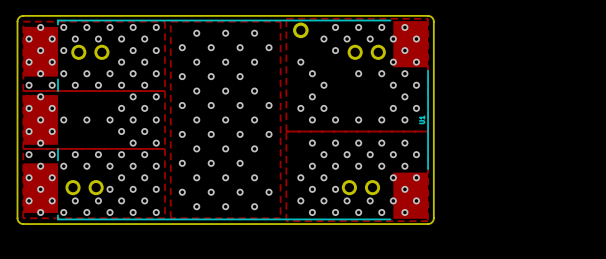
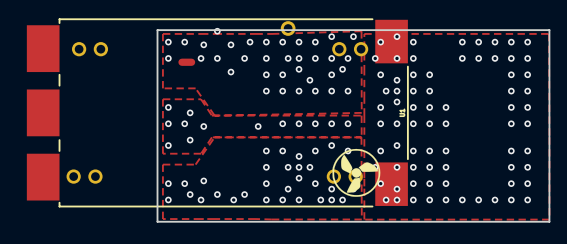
board edge: (23, 15) (430, 16) (433, 21) (433, 221) (428, 224) (20, 223) (17, 218) (17, 21) (19, 17) (23, 15) -> none
zone outline: (286, 18) (286, 221) (428, 221) (428, 18) (286, 18) -> none
zone outline: (23, 21) (23, 218) (164, 218) (164, 21) (23, 21) -> none
zone outline: (170, 21) (280, 21) (280, 218) (170, 218) (170, 21) -> none
via: (40, 27) -> none
via: (63, 27) -> none
via: (86, 27) -> none
via: (110, 27) -> none
via: (133, 27) -> none
via: (156, 27) -> none
via: (335, 27) -> none
via: (358, 27) -> none
via: (381, 27) -> none
via: (404, 27) -> none
board edge: none -> (157, 30) (549, 30) (549, 221) (157, 221) (157, 30)
via: (196, 33) -> none
via: (254, 33) -> none
zone outline: none -> (361, 31) (162, 33) (162, 88) (195, 88) (214, 115) (361, 112) (361, 31)
zone outline: none -> (364, 33) (549, 33) (549, 219) (364, 219) (364, 33)
via: (29, 39) -> none
via: (52, 39) -> none
via: (75, 39) -> none
via: (98, 39) -> none
via: (121, 39) -> none
via: (144, 39) -> none
via: (323, 39) -> none
via: (393, 39) -> none
via: none -> (168, 42)
via: none -> (184, 42)
via: none -> (250, 42)
via: none -> (266, 42)
via: none -> (282, 42)
via: none -> (299, 42)
via: none -> (315, 42)
via: none -> (380, 42)
via: none -> (413, 42)
via: none -> (462, 42)
via: none -> (478, 42)
via: none -> (495, 42)
via: none -> (511, 42)
via: none -> (527, 42)
via: (182, 47) -> none
via: (269, 47) -> none
via: (40, 50) -> none
via: (63, 50) -> none
via: (133, 50) -> none
via: (156, 50) -> none
via: (335, 50) -> none
via: (404, 50) -> none
via: (29, 62) -> none
via: (52, 62) -> none
via: (121, 62) -> none
via: (144, 62) -> none
via: none -> (168, 58)
via: (196, 62) -> none
via: none -> (201, 58)
via: none -> (266, 58)
via: none -> (299, 58)
via: none -> (315, 58)
via: none -> (331, 58)
via: none -> (348, 58)
via: none -> (413, 58)
via: none -> (462, 58)
via: none -> (478, 58)
via: none -> (495, 58)
via: none -> (511, 58)
via: none -> (527, 58)
track: none -> (181, 62) (191, 62)
via: (40, 73) -> none
via: (63, 73) -> none
via: (86, 73) -> none
via: (110, 73) -> none
via: (133, 73) -> none
via: (156, 73) -> none
via: (381, 73) -> none
via: (404, 73) -> none
via: (182, 76) -> none
via: (211, 76) -> none
via: none -> (266, 74)
via: none -> (282, 74)
via: none -> (331, 74)
via: none -> (380, 74)
via: none -> (413, 74)
via: none -> (429, 74)
via: none -> (511, 74)
via: none -> (527, 74)
via: (29, 85) -> none
via: (52, 85) -> none
via: (75, 85) -> none
via: (98, 85) -> none
via: (121, 85) -> none
via: (144, 85) -> none
via: (393, 85) -> none
zone outline: (23, 91) (164, 91) -> none
via: (196, 91) -> none
via: (225, 91) -> none
via: (254, 91) -> none
via: (40, 96) -> none
via: (133, 96) -> none
via: (156, 96) -> none
via: none -> (266, 91)
via: none -> (282, 91)
via: none -> (315, 91)
via: none -> (331, 91)
via: none -> (348, 91)
via: none -> (397, 91)
via: none -> (413, 91)
via: none -> (429, 91)
via: none -> (511, 91)
via: none -> (527, 91)
zone outline: none -> (162, 99) (162, 153) (201, 153) (211, 137) (361, 137) (361, 115) (211, 115) (201, 99) (162, 99)
via: (182, 105) -> none
via: (211, 105) -> none
via: (240, 105) -> none
via: (269, 105) -> none
via: (29, 108) -> none
via: (52, 108) -> none
via: (121, 108) -> none
via: (144, 108) -> none
via: (300, 108) -> none
via: (323, 108) -> none
via: (393, 108) -> none
via: none -> (168, 107)
via: none -> (380, 107)
via: none -> (413, 107)
via: none -> (429, 107)
via: none -> (446, 107)
via: none -> (511, 107)
via: none -> (527, 107)
via: (40, 119) -> none
via: (63, 119) -> none
via: (86, 119) -> none
via: (110, 119) -> none
via: (133, 119) -> none
via: (156, 119) -> none
via: (225, 119) -> none
via: (254, 119) -> none
via: (312, 119) -> none
via: (335, 119) -> none
via: (358, 119) -> none
via: (381, 119) -> none
via: (404, 119) -> none
via: (29, 131) -> none
via: (52, 131) -> none
via: (121, 131) -> none
via: (144, 131) -> none
via: none -> (168, 123)
via: none -> (184, 123)
zone outline: (286, 131) (428, 131) -> none
via: none -> (282, 123)
via: none -> (299, 123)
via: none -> (315, 123)
via: none -> (331, 123)
via: none -> (348, 123)
via: none -> (380, 123)
via: none -> (397, 123)
via: none -> (413, 123)
via: none -> (429, 123)
via: none -> (446, 123)
via: none -> (511, 123)
via: none -> (527, 123)
via: (182, 134) -> none
via: (240, 134) -> none
via: (40, 143) -> none
via: (133, 143) -> none
via: (156, 143) -> none
via: (312, 143) -> none
via: (335, 143) -> none
via: (358, 143) -> none
via: (381, 143) -> none
via: (404, 143) -> none
zone outline: none -> (214, 137) (195, 164) (162, 164) (162, 219) (361, 219) (361, 137)
zone outline: (23, 148) (164, 148) -> none
via: (225, 148) -> none
via: (254, 148) -> none
via: (29, 154) -> none
via: (52, 154) -> none
via: (75, 154) -> none
via: (98, 154) -> none
via: (121, 154) -> none
via: (144, 154) -> none
via: none -> (168, 145)
via: (323, 154) -> none
via: (370, 154) -> none
via: (393, 154) -> none
drawing: none -> [332, 148, 381, 197]
via: none -> (266, 150)
via: none -> (282, 150)
via: none -> (315, 150)
via: none -> (348, 150)
via: none -> (380, 150)
via: none -> (413, 150)
via: none -> (429, 150)
via: none -> (446, 150)
via: none -> (511, 150)
via: none -> (527, 150)
via: (182, 163) -> none
via: (211, 163) -> none
via: (240, 163) -> none
via: (40, 166) -> none
via: (63, 166) -> none
via: (86, 166) -> none
via: (110, 166) -> none
via: (133, 166) -> none
via: (156, 166) -> none
via: (335, 166) -> none
via: (358, 166) -> none
via: (381, 166) -> none
via: (404, 166) -> none
via: (29, 177) -> none
via: (52, 177) -> none
via: (121, 177) -> none
via: (144, 177) -> none
via: (196, 177) -> none
via: (225, 177) -> none
via: (254, 177) -> none
via: none -> (266, 167)
via: none -> (299, 167)
via: none -> (413, 167)
via: none -> (429, 167)
via: none -> (446, 167)
via: none -> (511, 167)
via: none -> (527, 167)
via: (40, 189) -> none
via: (110, 189) -> none
via: (133, 189) -> none
via: (156, 189) -> none
via: (335, 189) -> none
via: (404, 189) -> none
via: (182, 192) -> none
via: (240, 192) -> none
via: (269, 192) -> none
via: none -> (168, 183)
via: none -> (184, 183)
via: none -> (266, 183)
via: none -> (315, 183)
via: none -> (380, 183)
via: none -> (413, 183)
via: none -> (429, 183)
via: none -> (446, 183)
via: none -> (511, 183)
via: none -> (527, 183)
via: (29, 200) -> none
via: (52, 200) -> none
via: (75, 200) -> none
via: (98, 200) -> none
via: (121, 200) -> none
via: (144, 200) -> none
via: (323, 200) -> none
via: (393, 200) -> none
via: (40, 212) -> none
via: (63, 212) -> none
via: (86, 212) -> none
via: (110, 212) -> none
via: (133, 212) -> none
via: (156, 212) -> none
via: none -> (168, 199)
via: none -> (201, 199)
via: none -> (233, 199)
via: none -> (266, 199)
via: none -> (282, 199)
via: none -> (331, 199)
via: (381, 212) -> none
via: none -> (397, 199)
via: none -> (413, 199)
via: none -> (429, 199)
via: none -> (446, 199)
via: none -> (462, 199)
via: none -> (478, 199)
via: none -> (495, 199)
via: none -> (511, 199)
via: none -> (527, 199)

